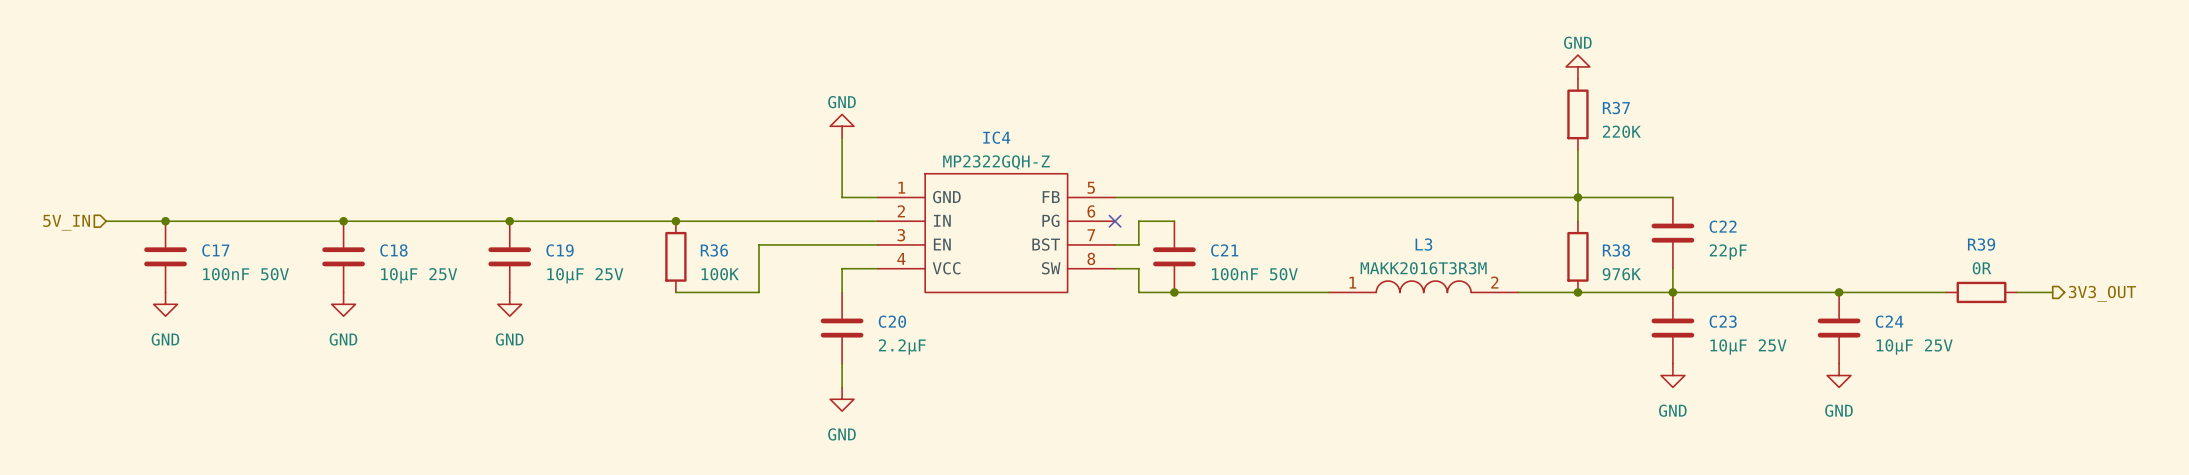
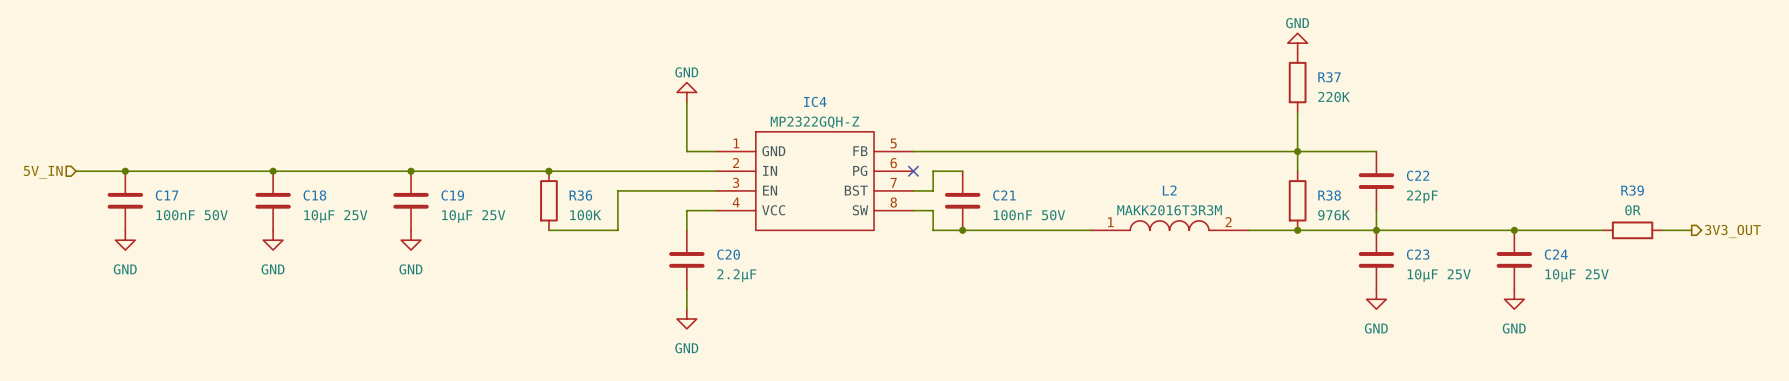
L3 name: L3 (1423, 244) -> L2 (1169, 190)

